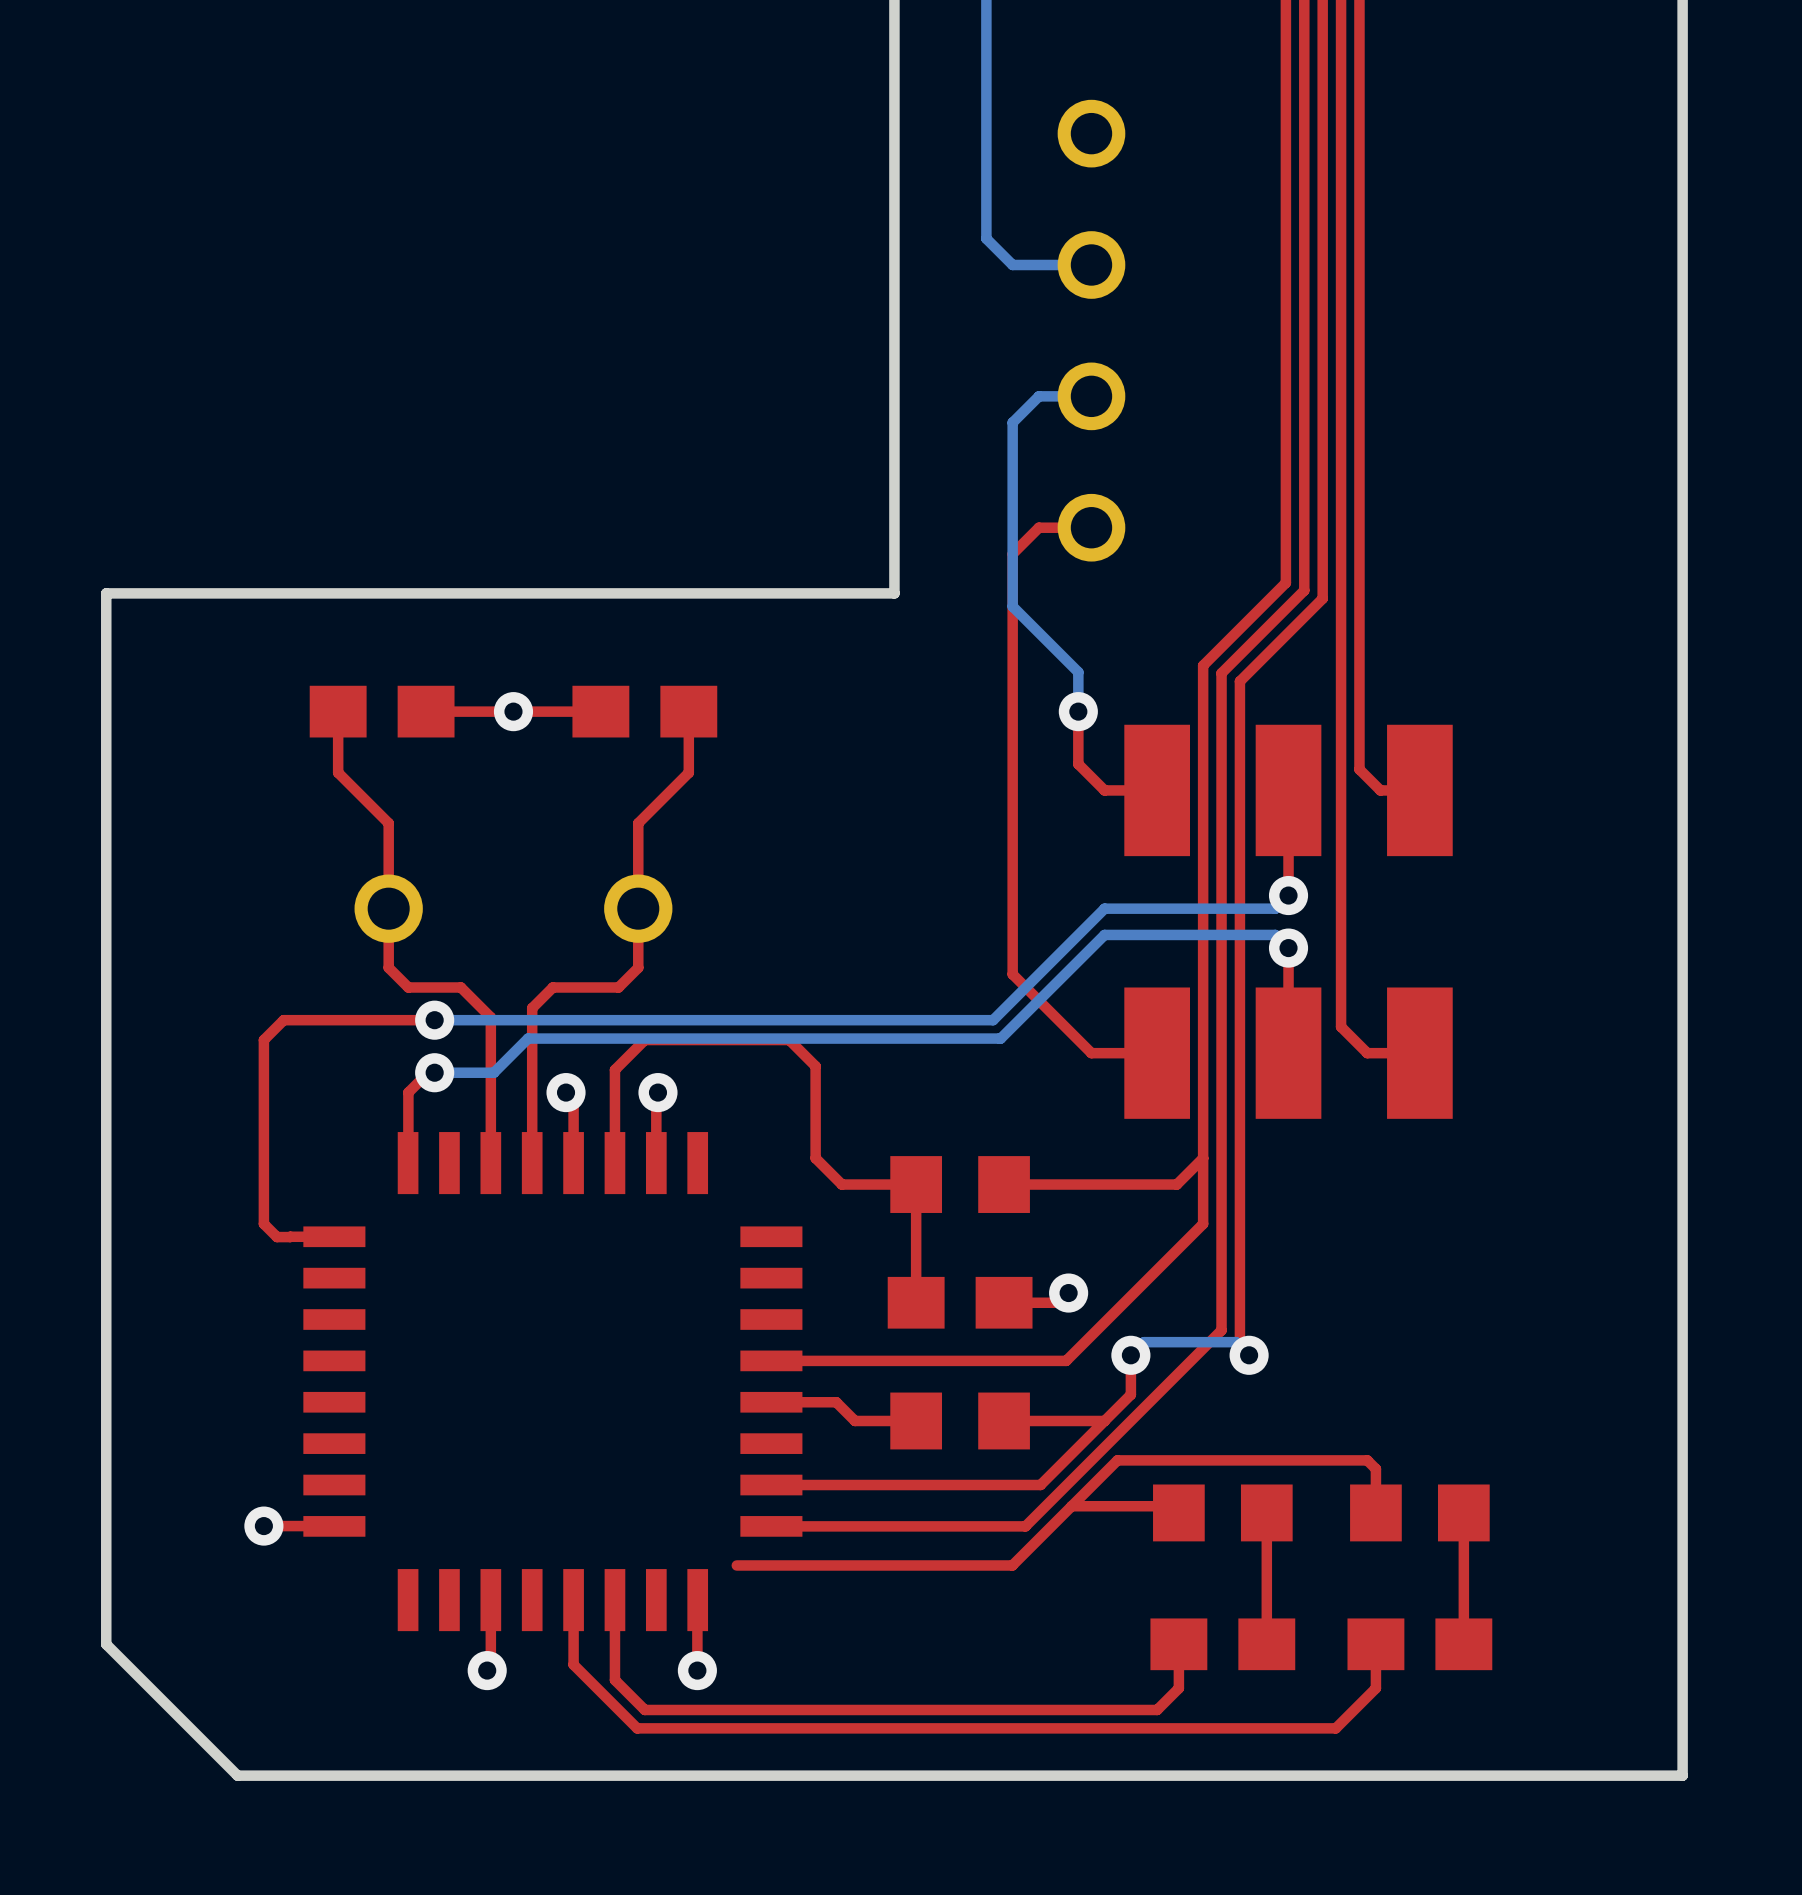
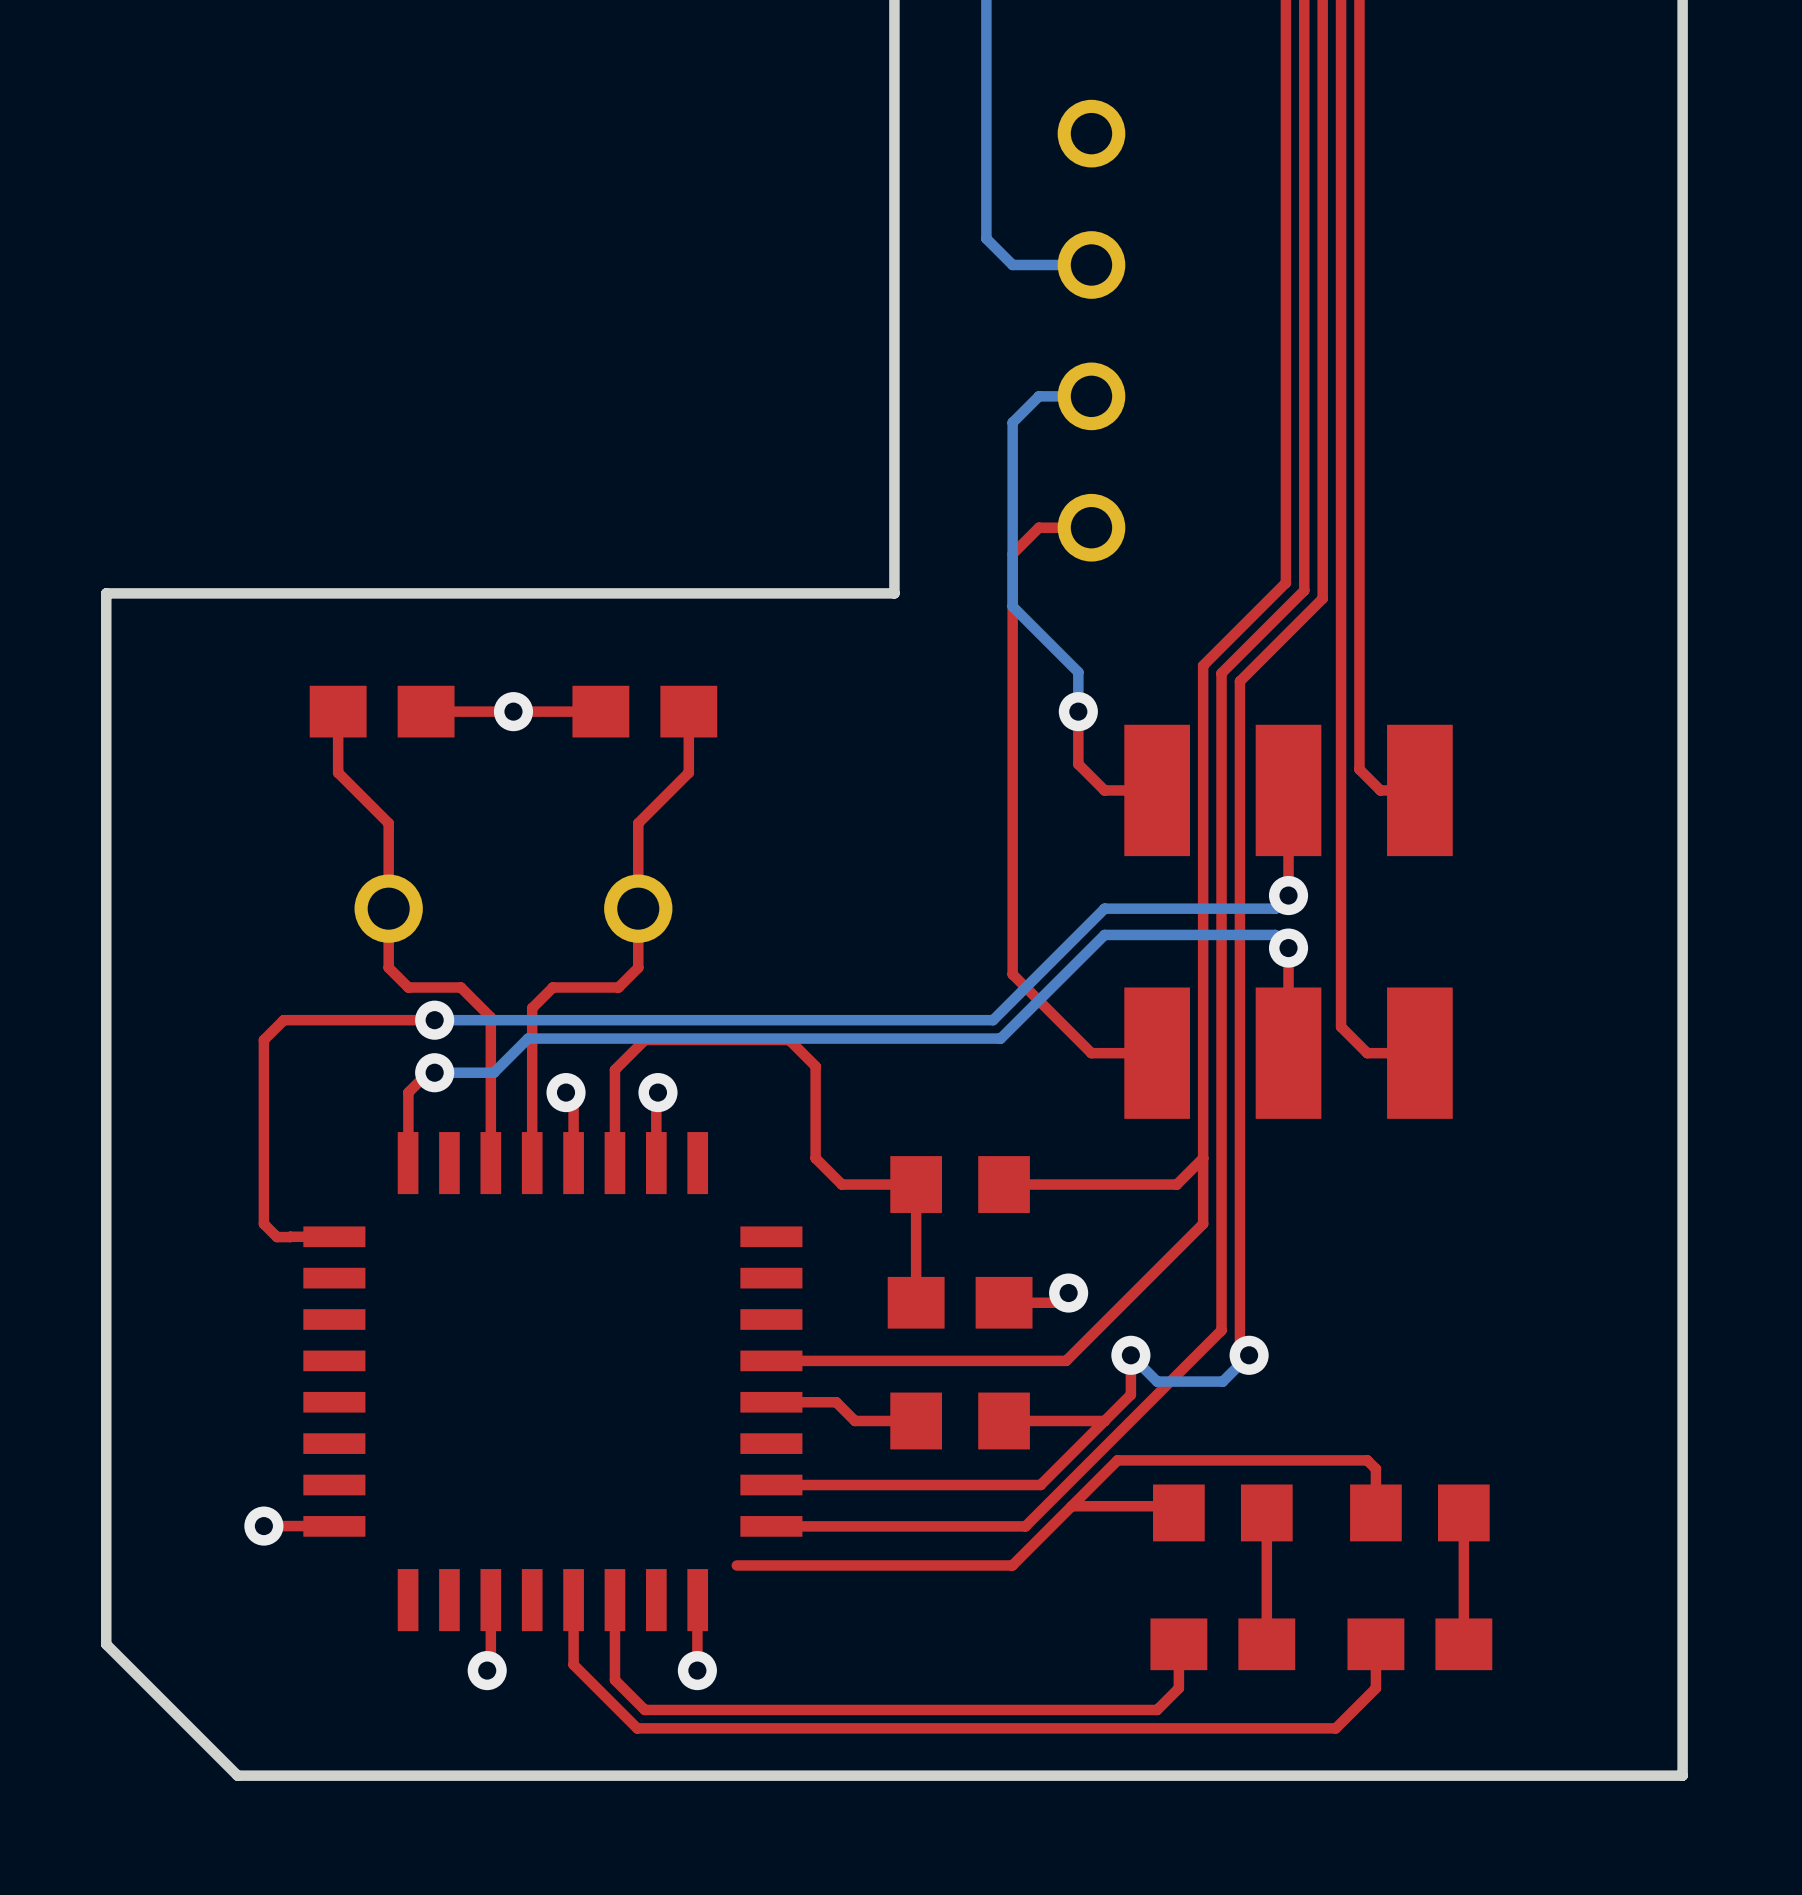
bottom track: (1249, 1355) (1235, 1342) (1144, 1342) (1130, 1355) -> (1249, 1355) (1222, 1381) (1157, 1381) (1130, 1355)

